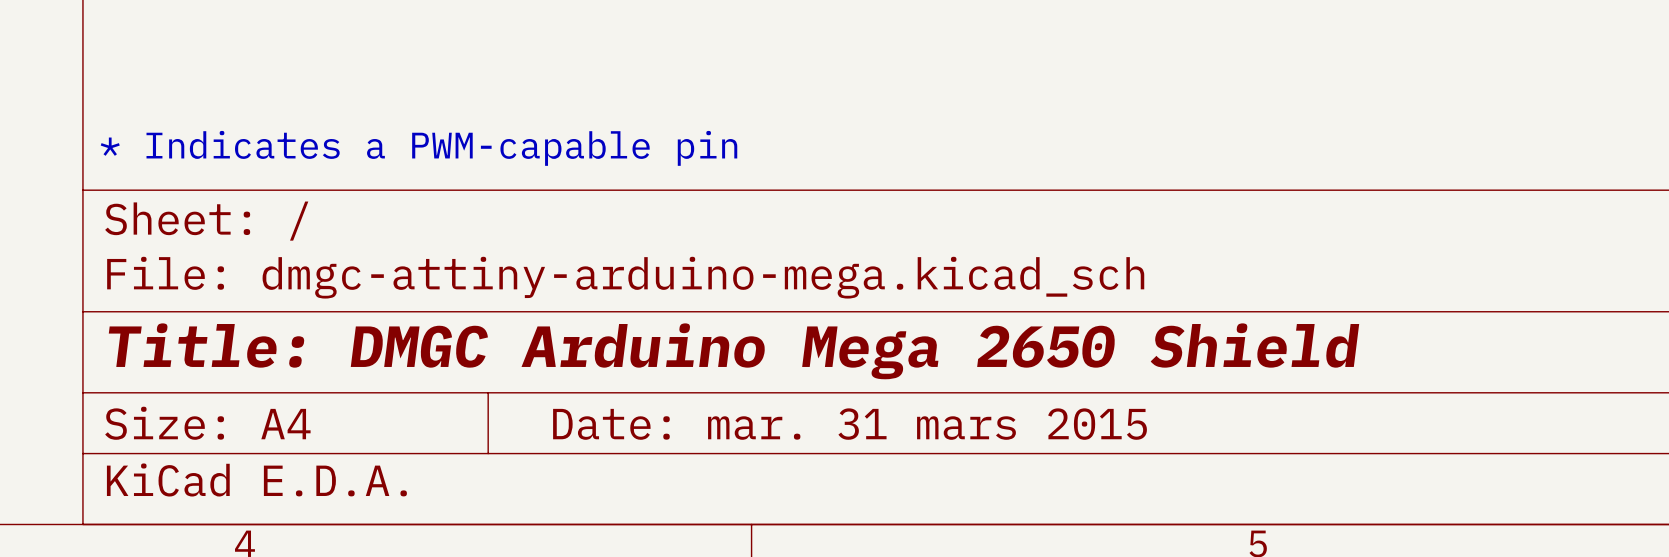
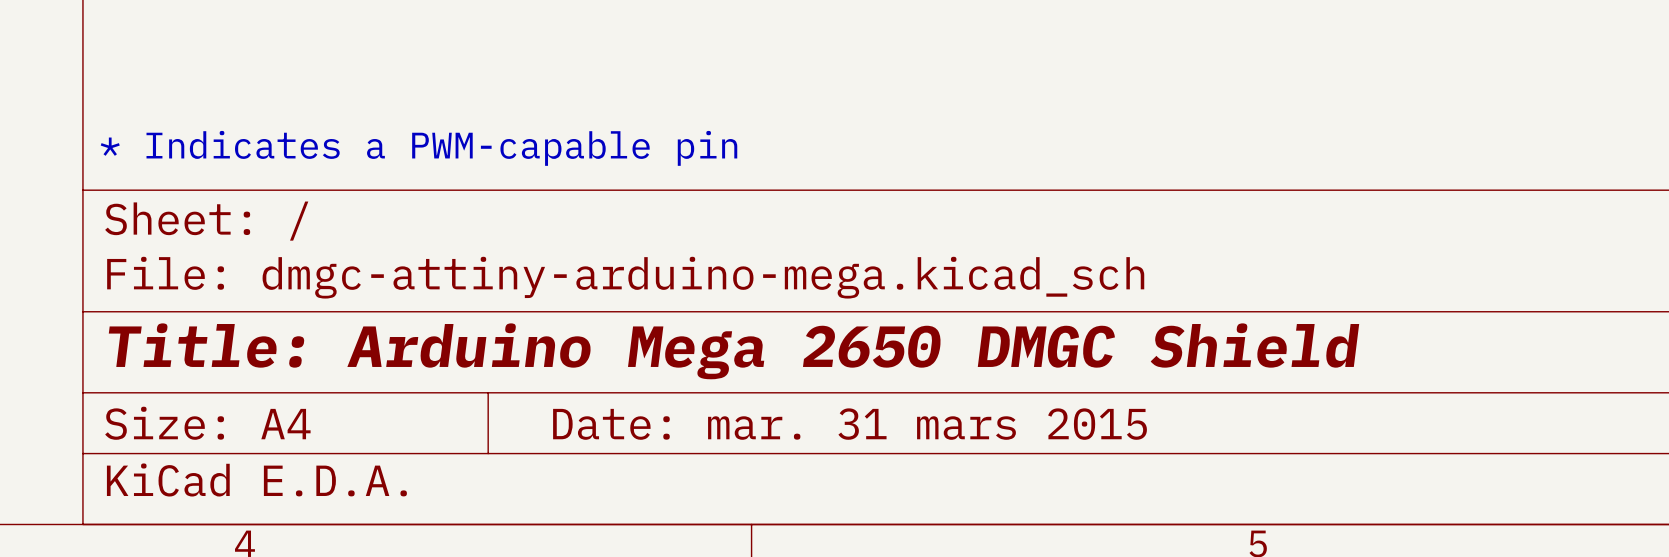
title block: Title: DMGC Arduino Mega 2650 Shield (733, 351) -> Title: Arduino Mega 2650 DMGC Shield (733, 351)

